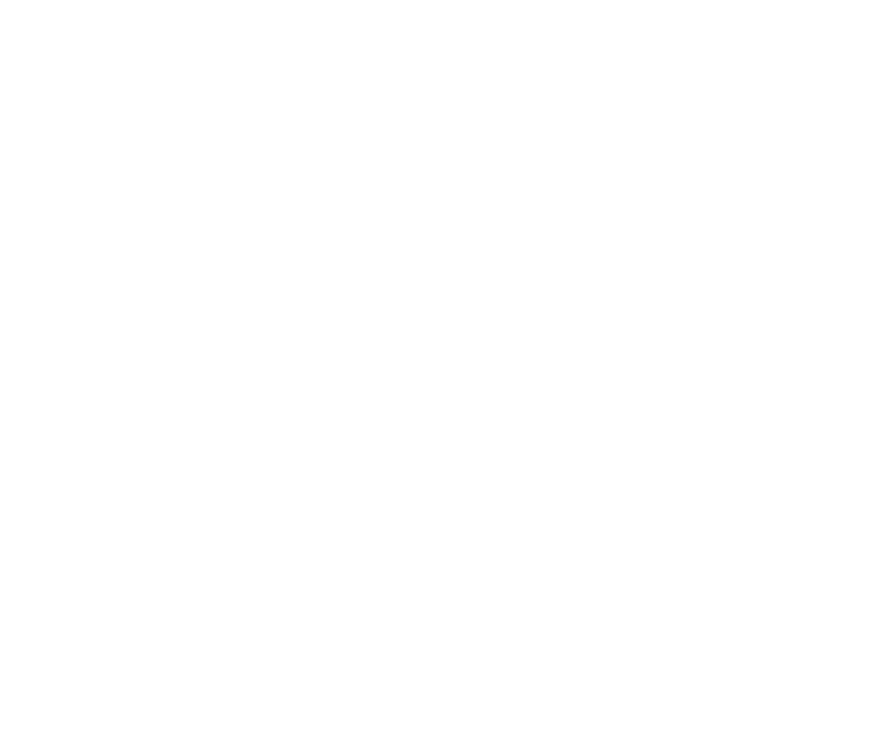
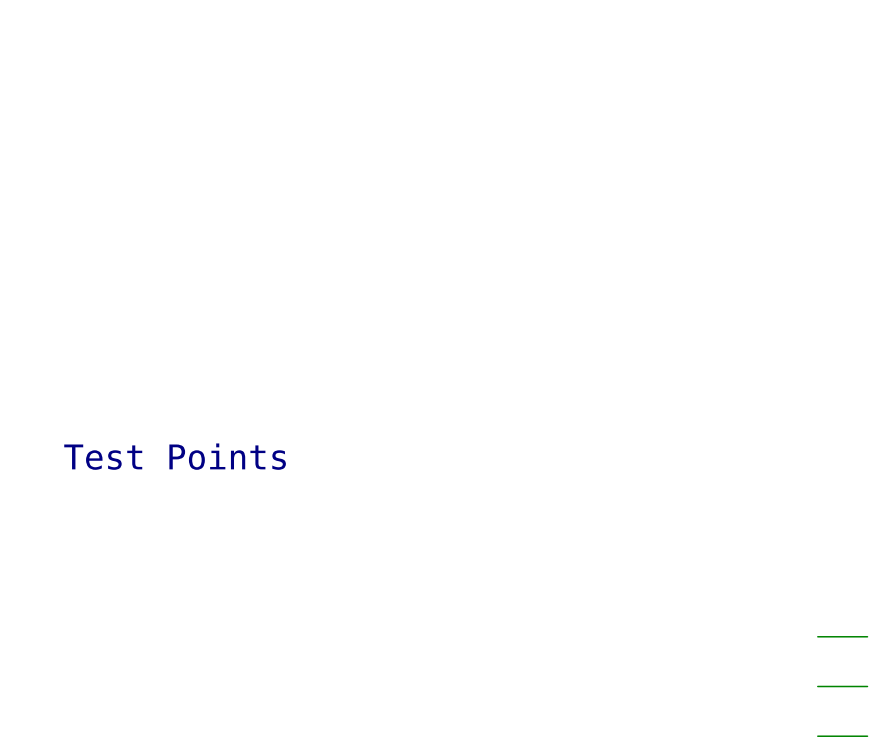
text: none -> Test Points (175, 456)
wire: none -> (817, 636) (867, 636)
wire: none -> (817, 686) (867, 686)
wire: none -> (817, 736) (867, 736)

